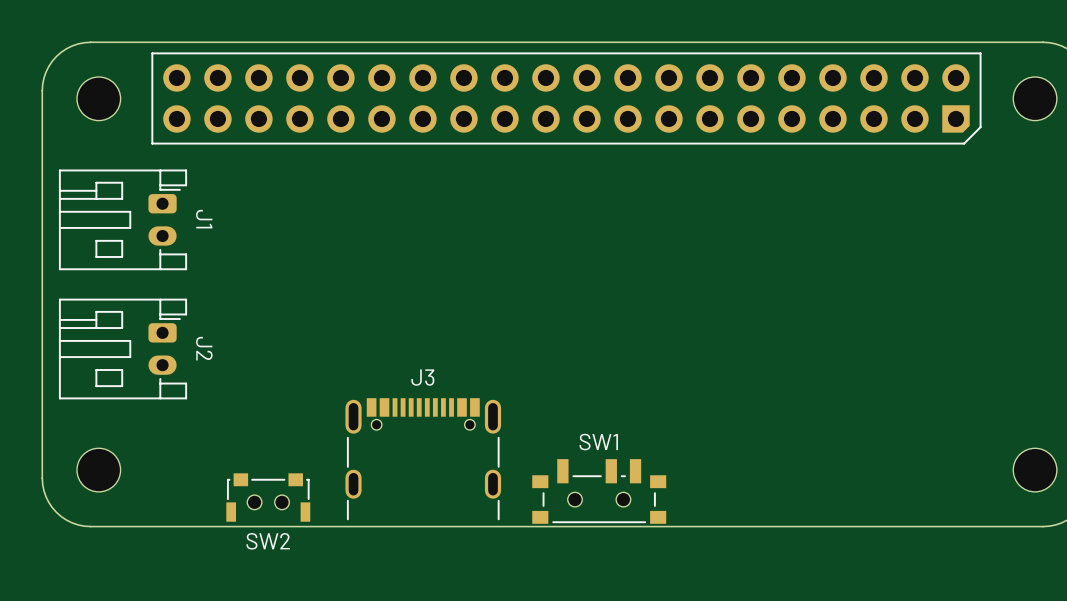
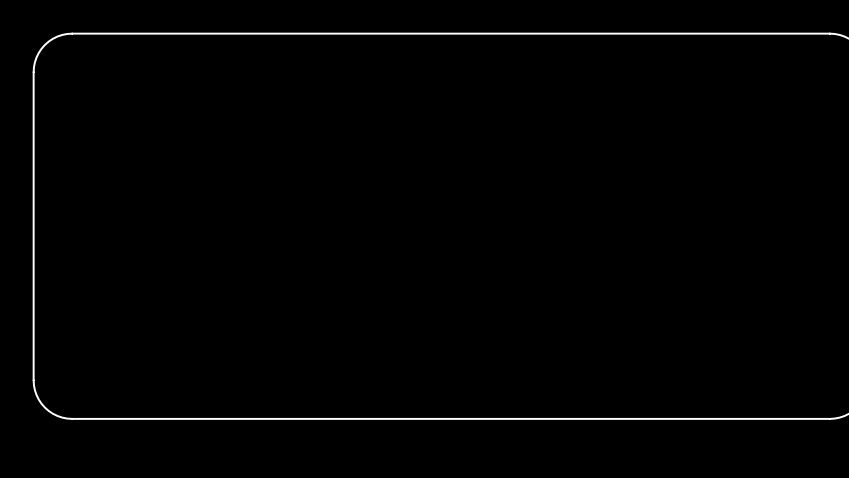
part: (98, 98) -> none
part: (566, 98) -> none
part: (1035, 98) -> none
J1: (123, 219) -> none
J2: (123, 349) -> none
J3: (423, 459) -> none
part: (98, 470) -> none
part: (1035, 470) -> none
SW1: (599, 491) -> none
SW2: (268, 497) -> none

